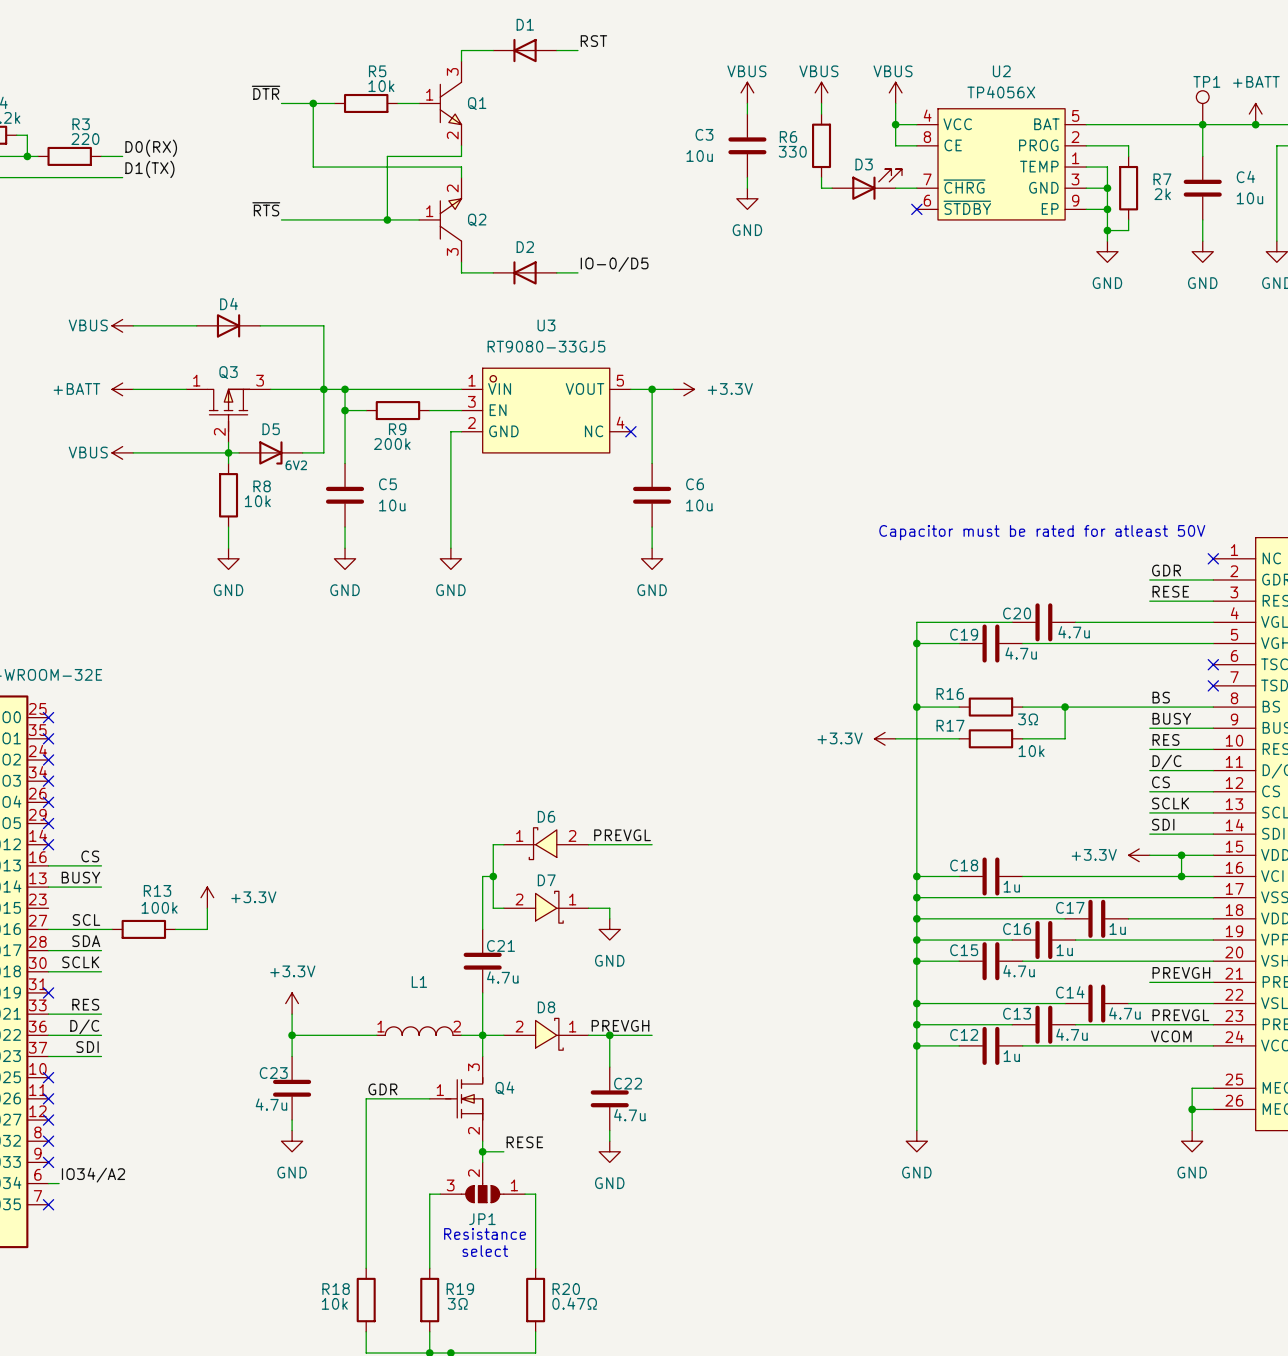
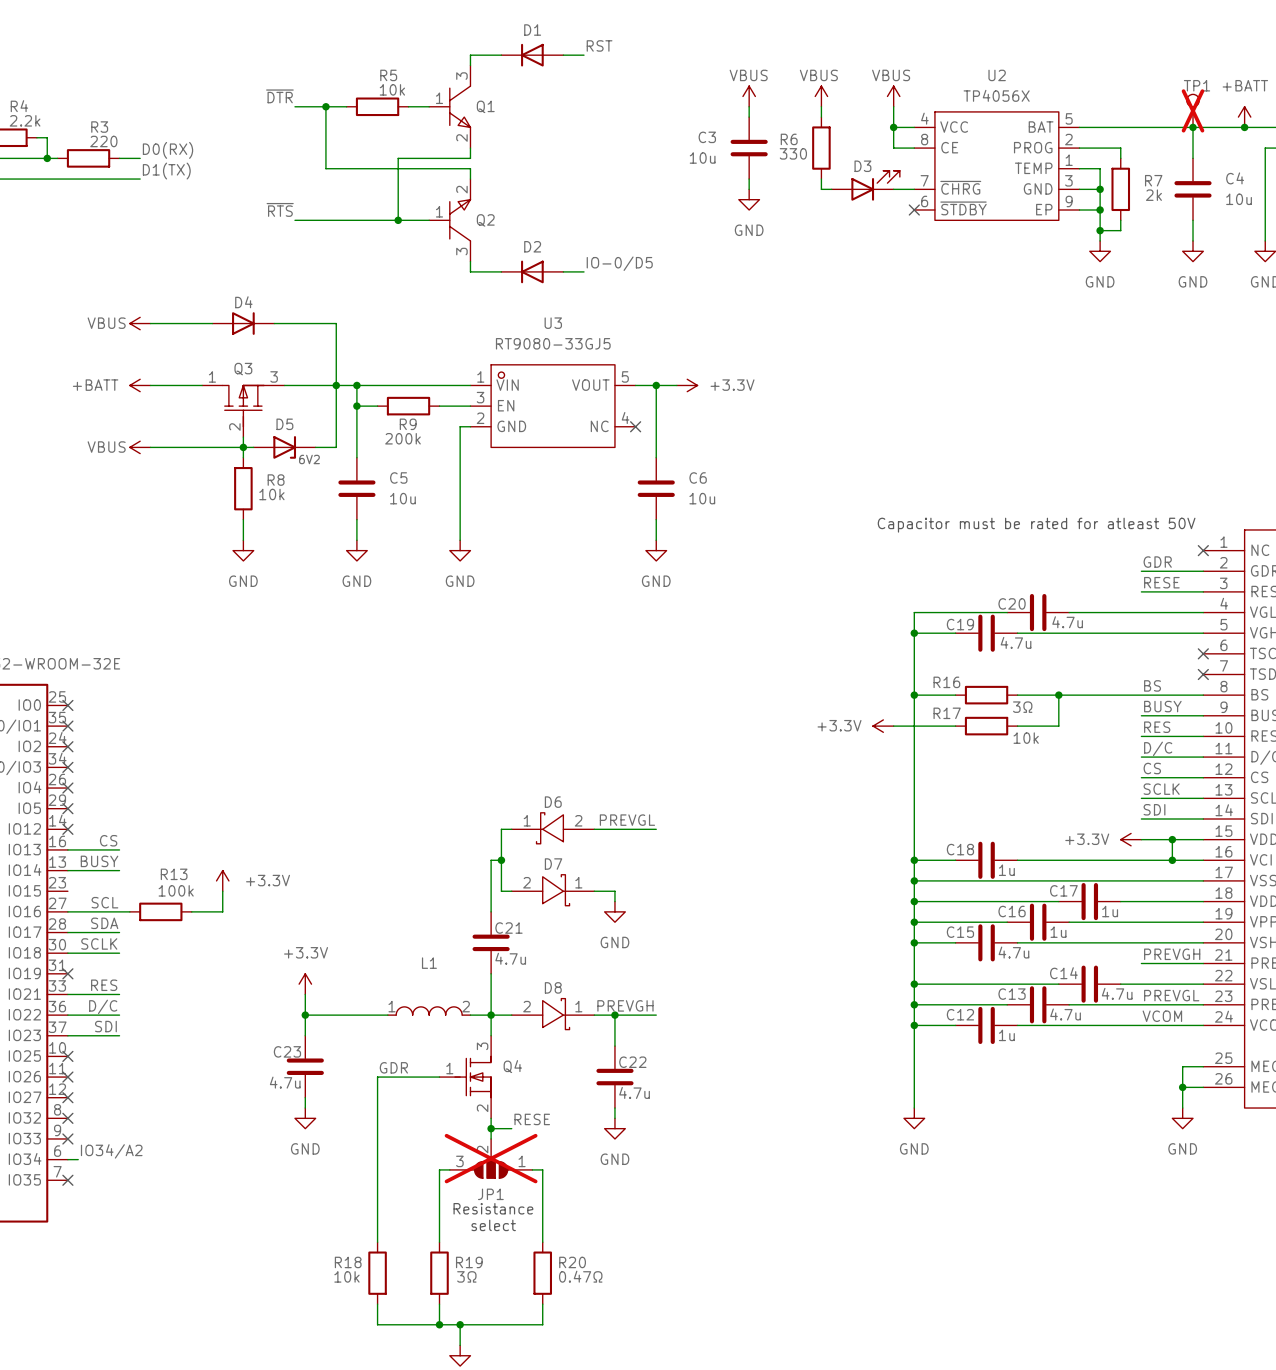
TP1 do-not-place cross: none -> (1193, 110)
JP1 do-not-place cross: none -> (491, 1158)

